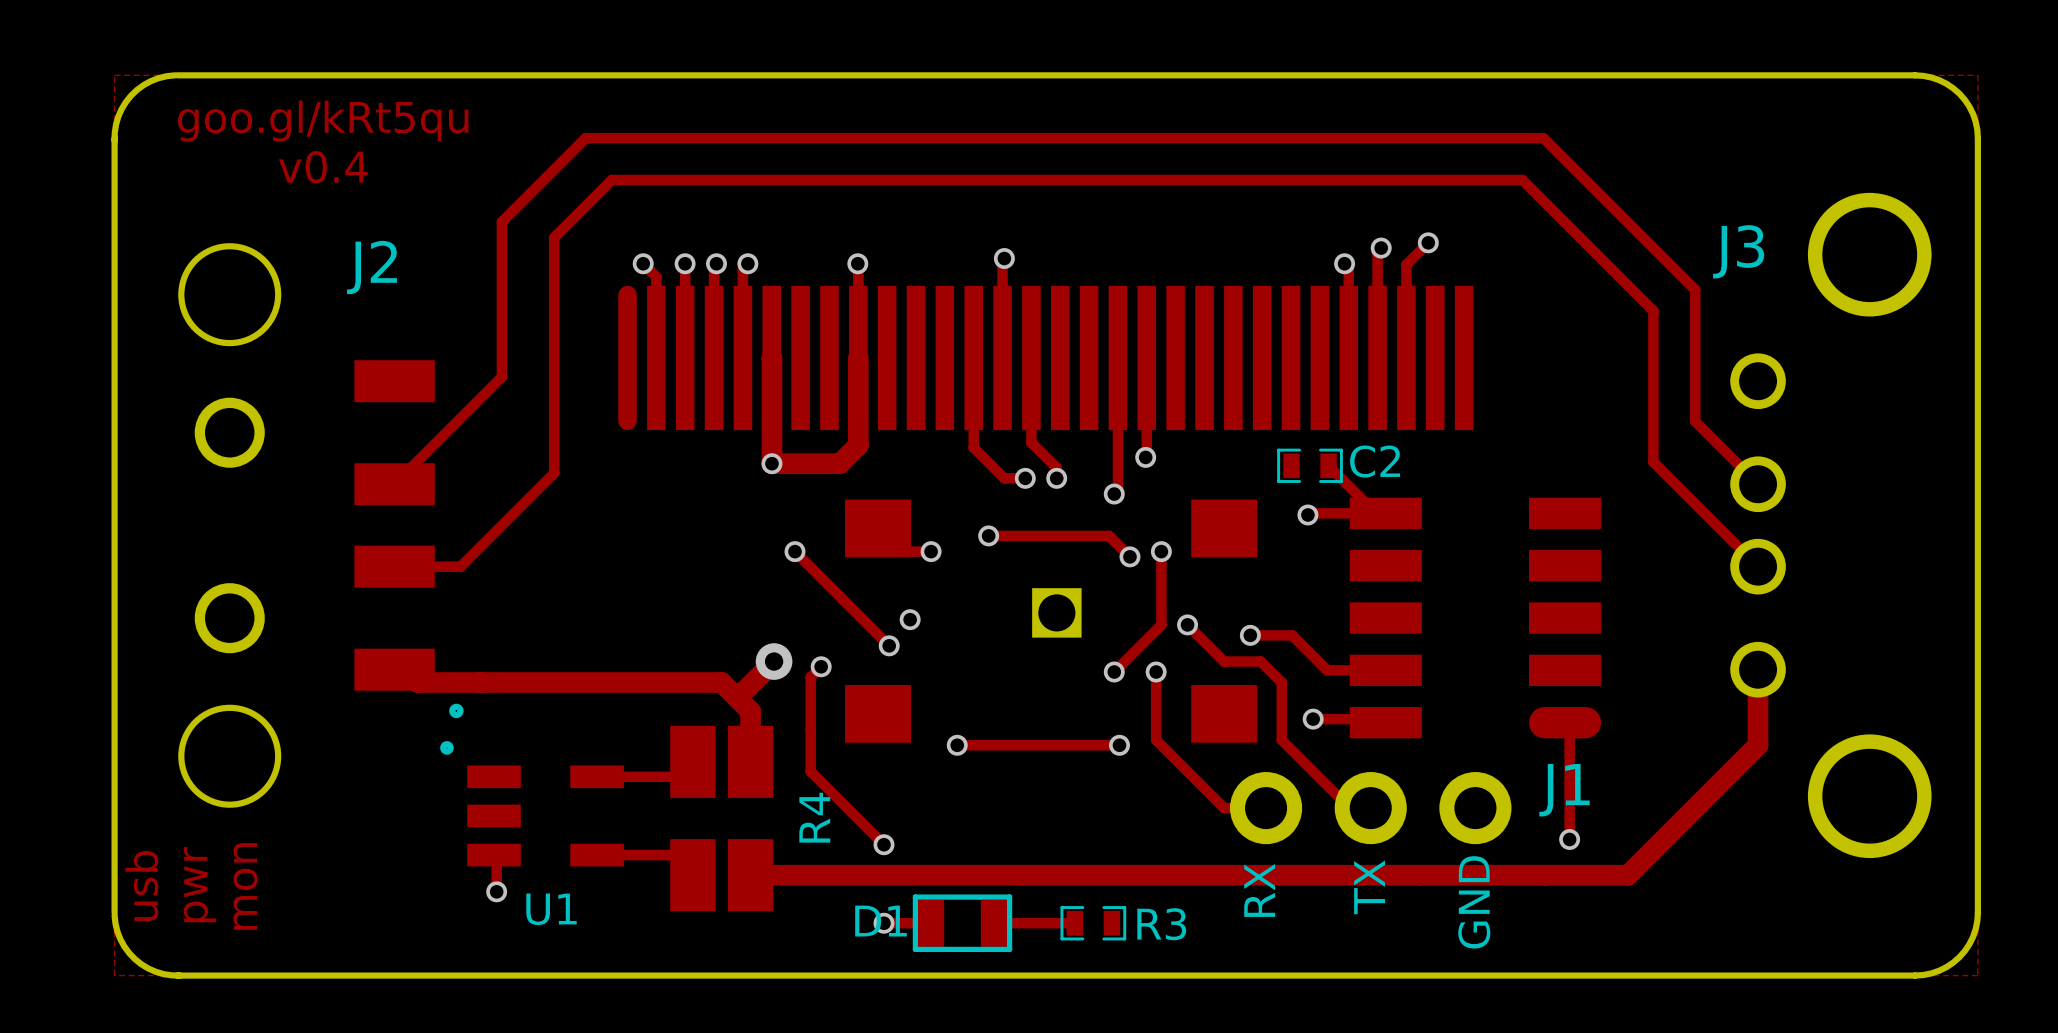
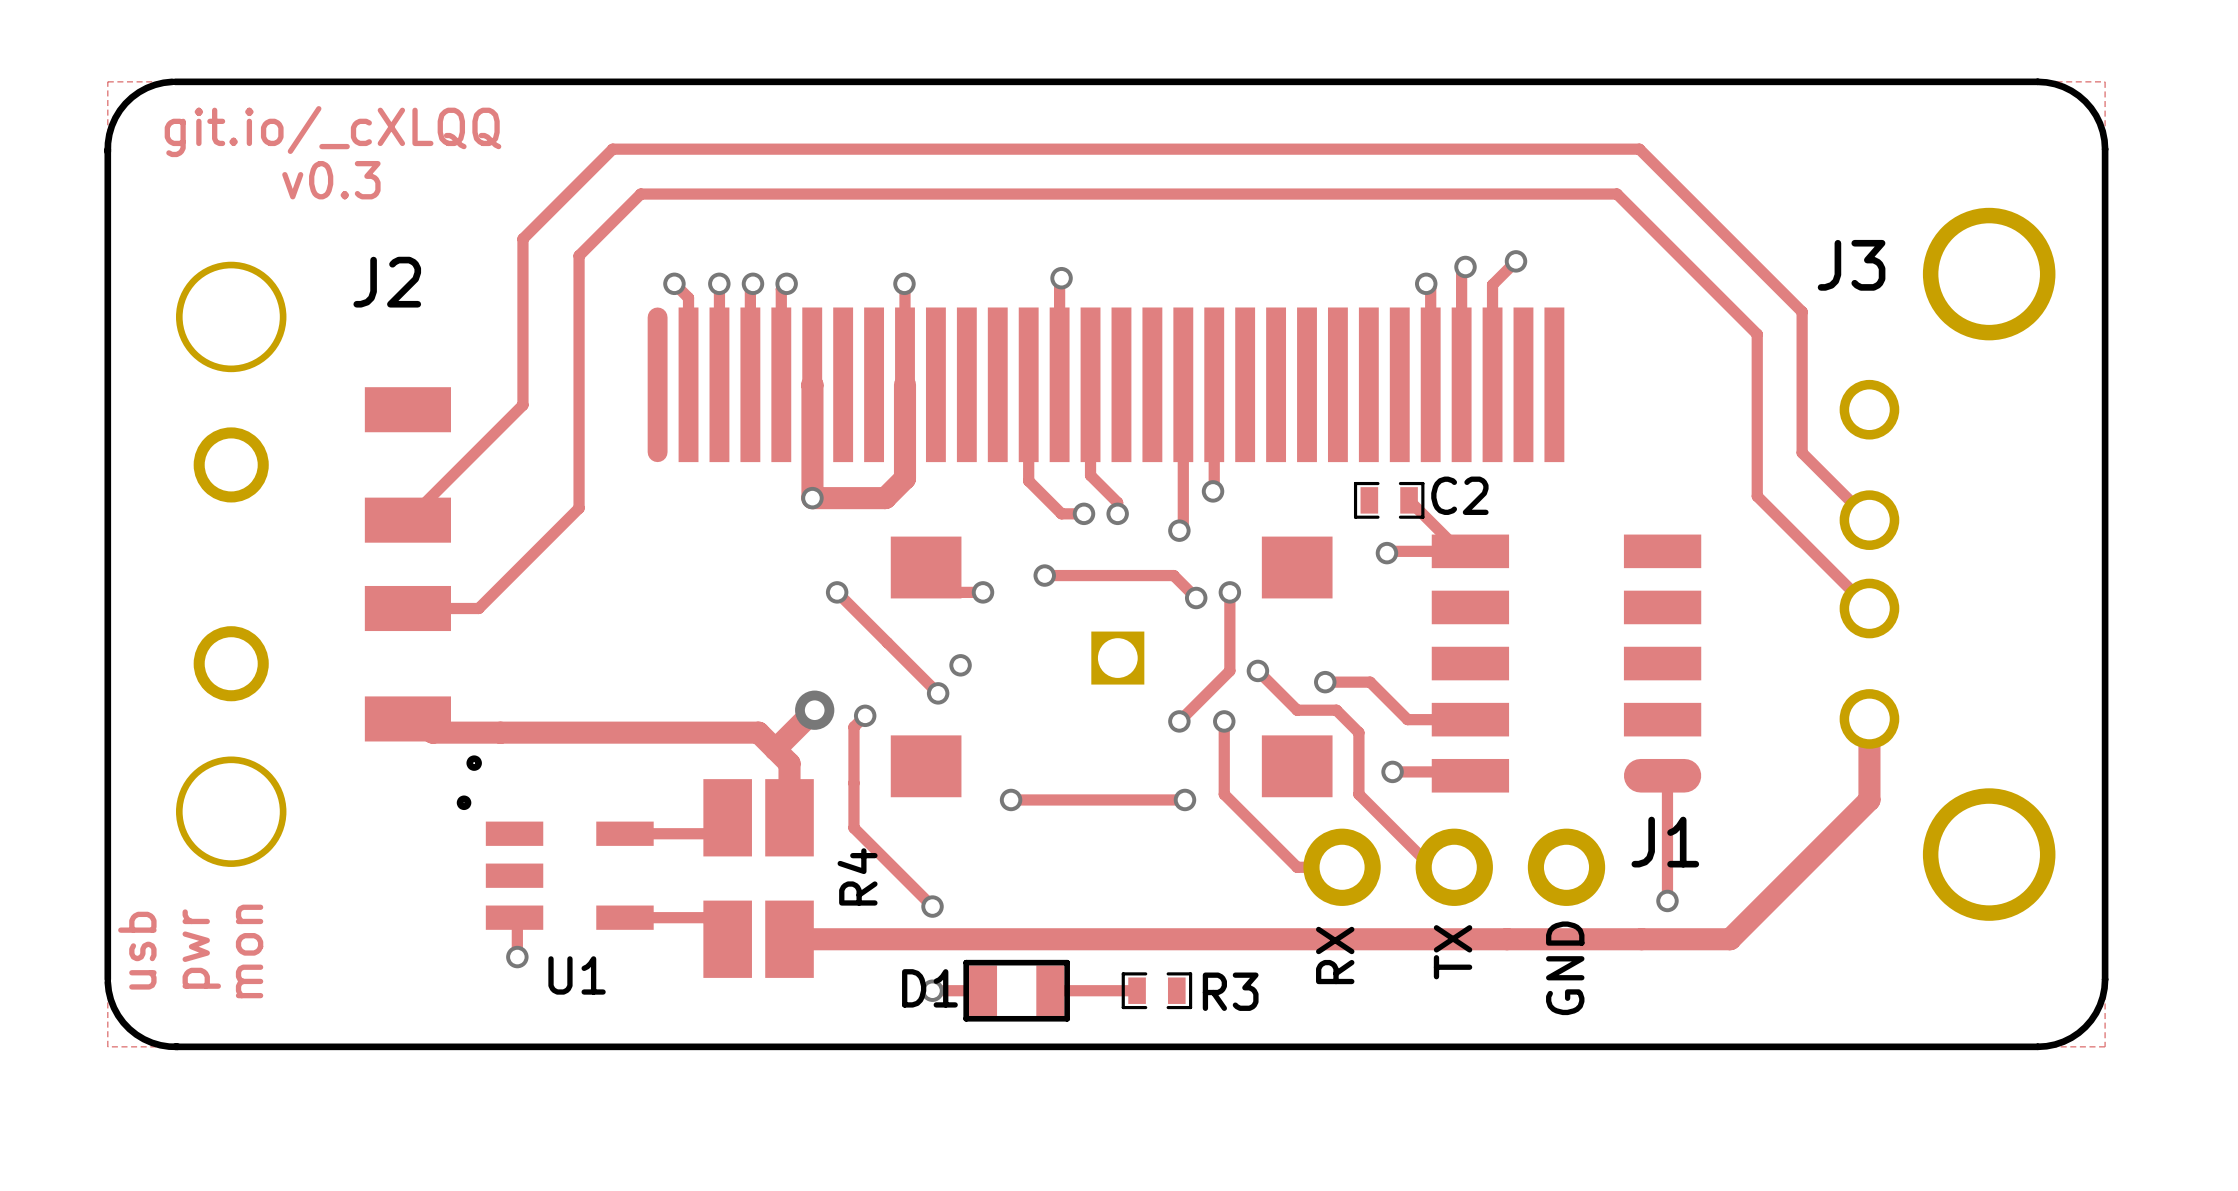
text: goo.gl/kRt5qu (323, 121) -> git.io/_cXLQQ (332, 131)
text: v0.4 (323, 167) -> v0.3 (331, 180)

